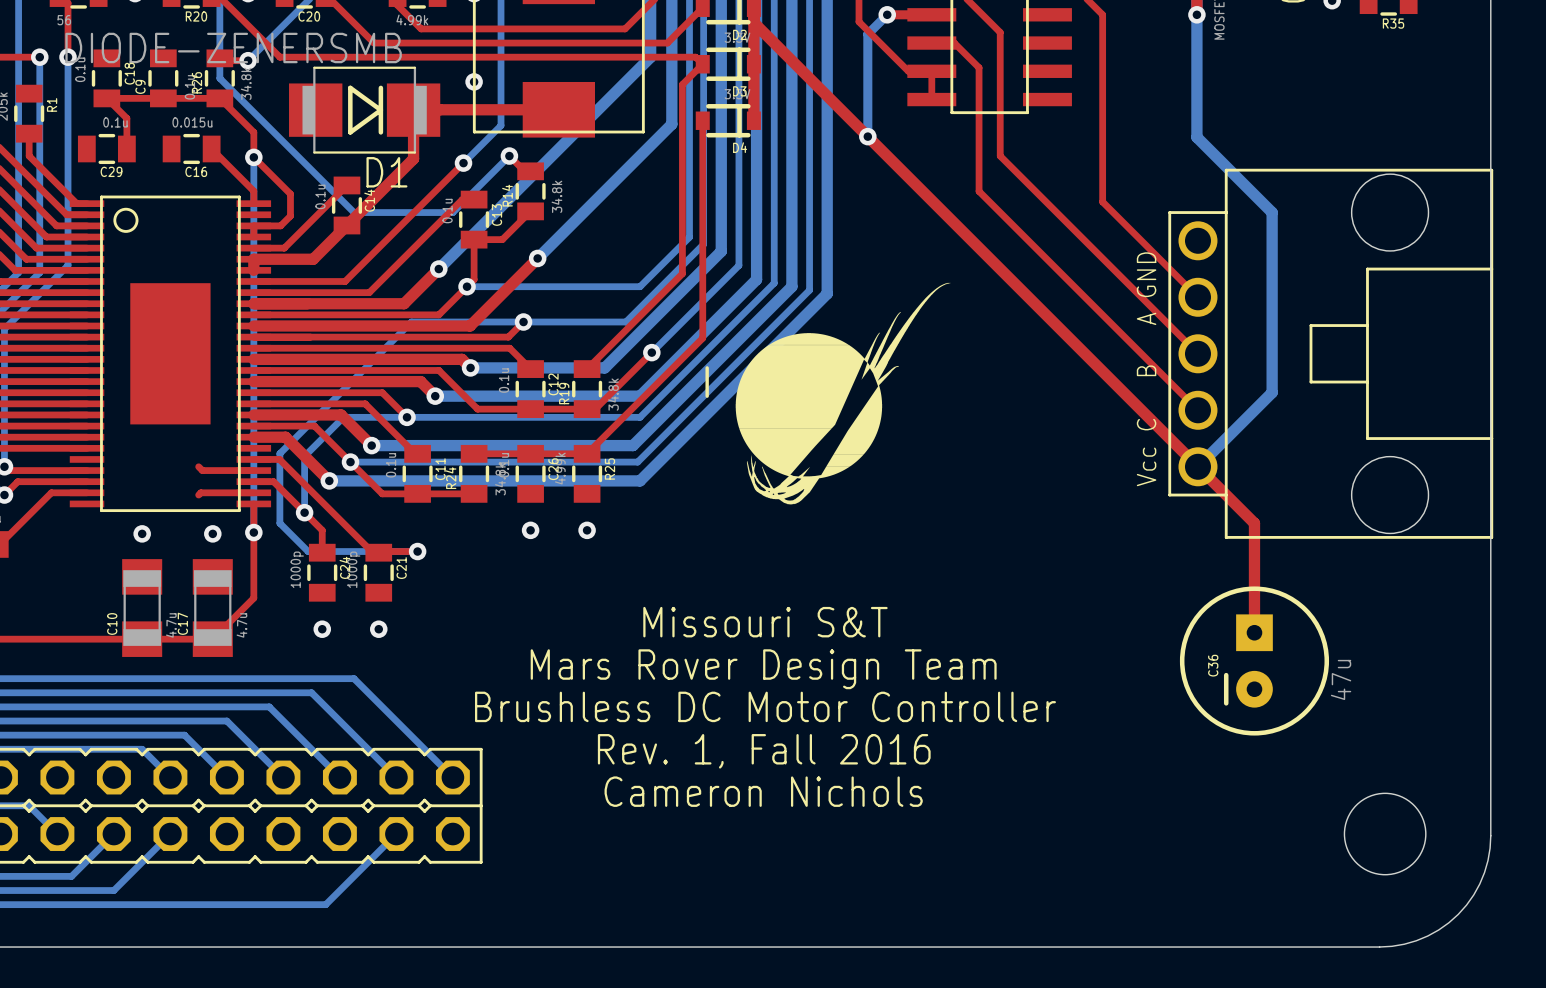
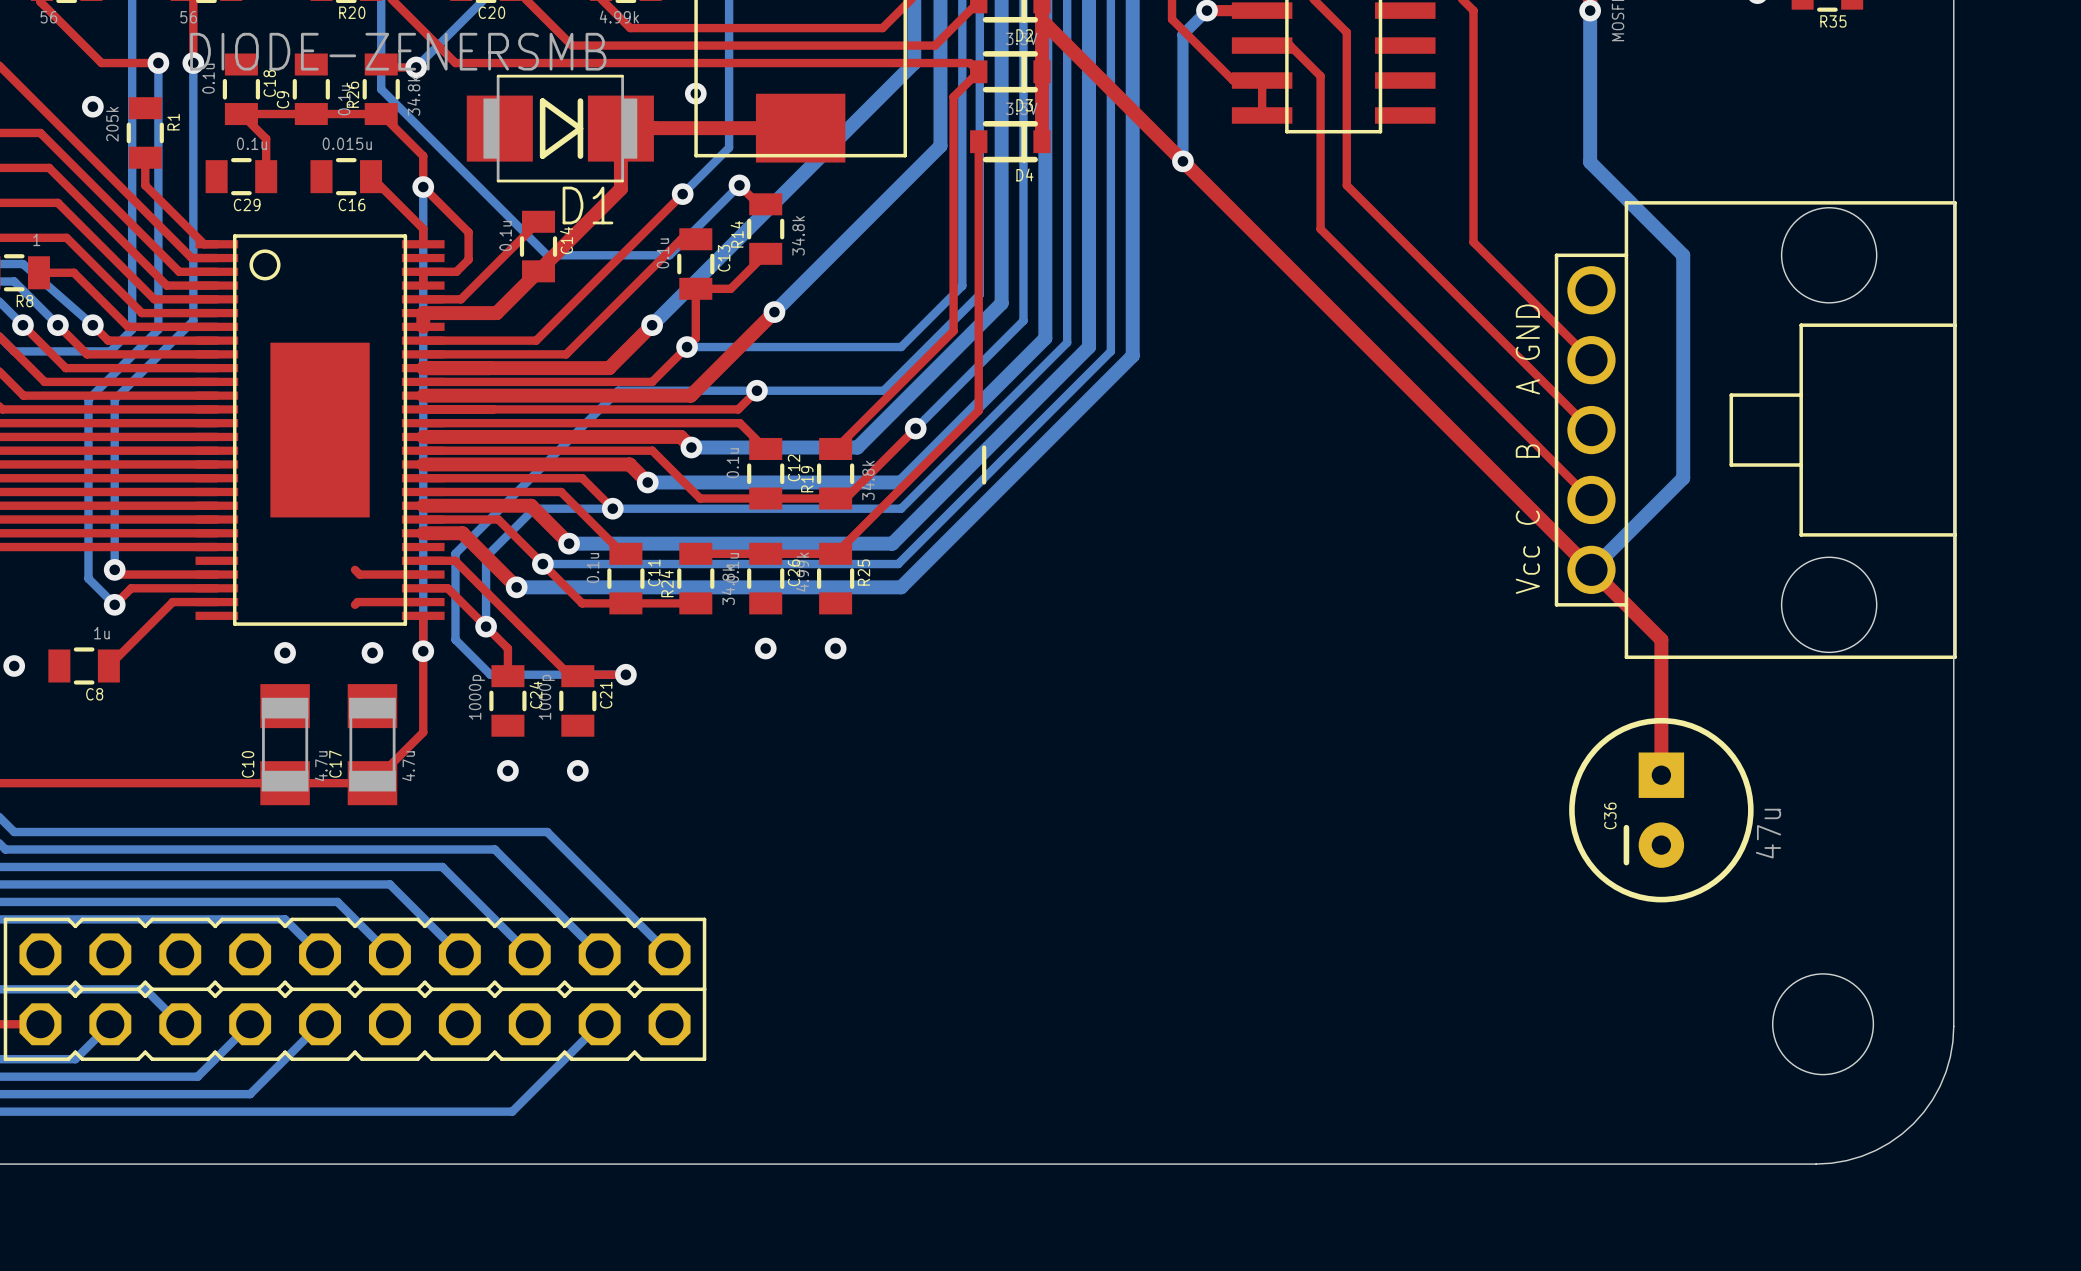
drawing: [735, 282, 951, 505] -> none
text: Missouri S&T (765, 622) -> none
text: Mars Rover Design Team (763, 669) -> none
text: Brushless DC Motor Controller (765, 706) -> none
text: Rev. 1, Fall 2016 (764, 751) -> none
text: Cameron Nichols (763, 791) -> none

